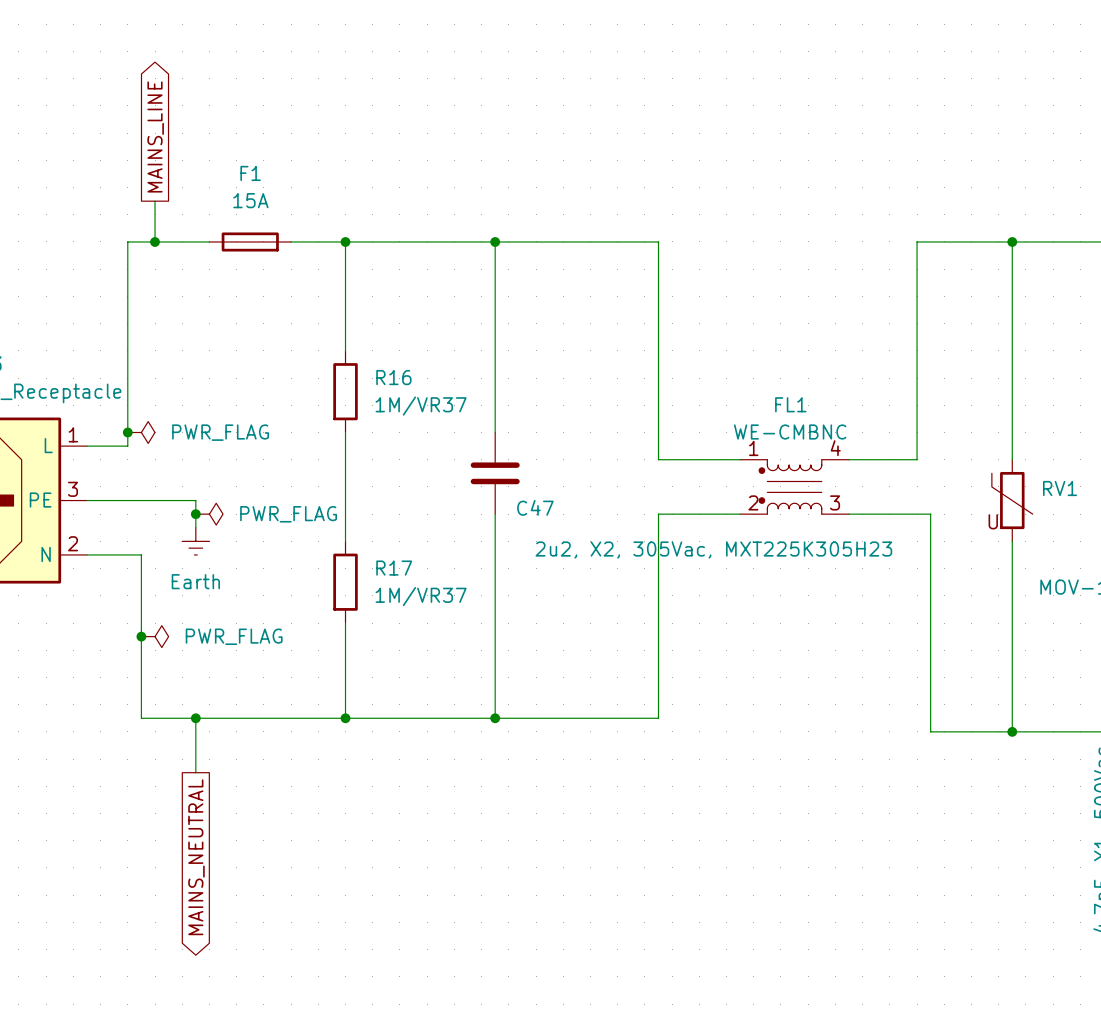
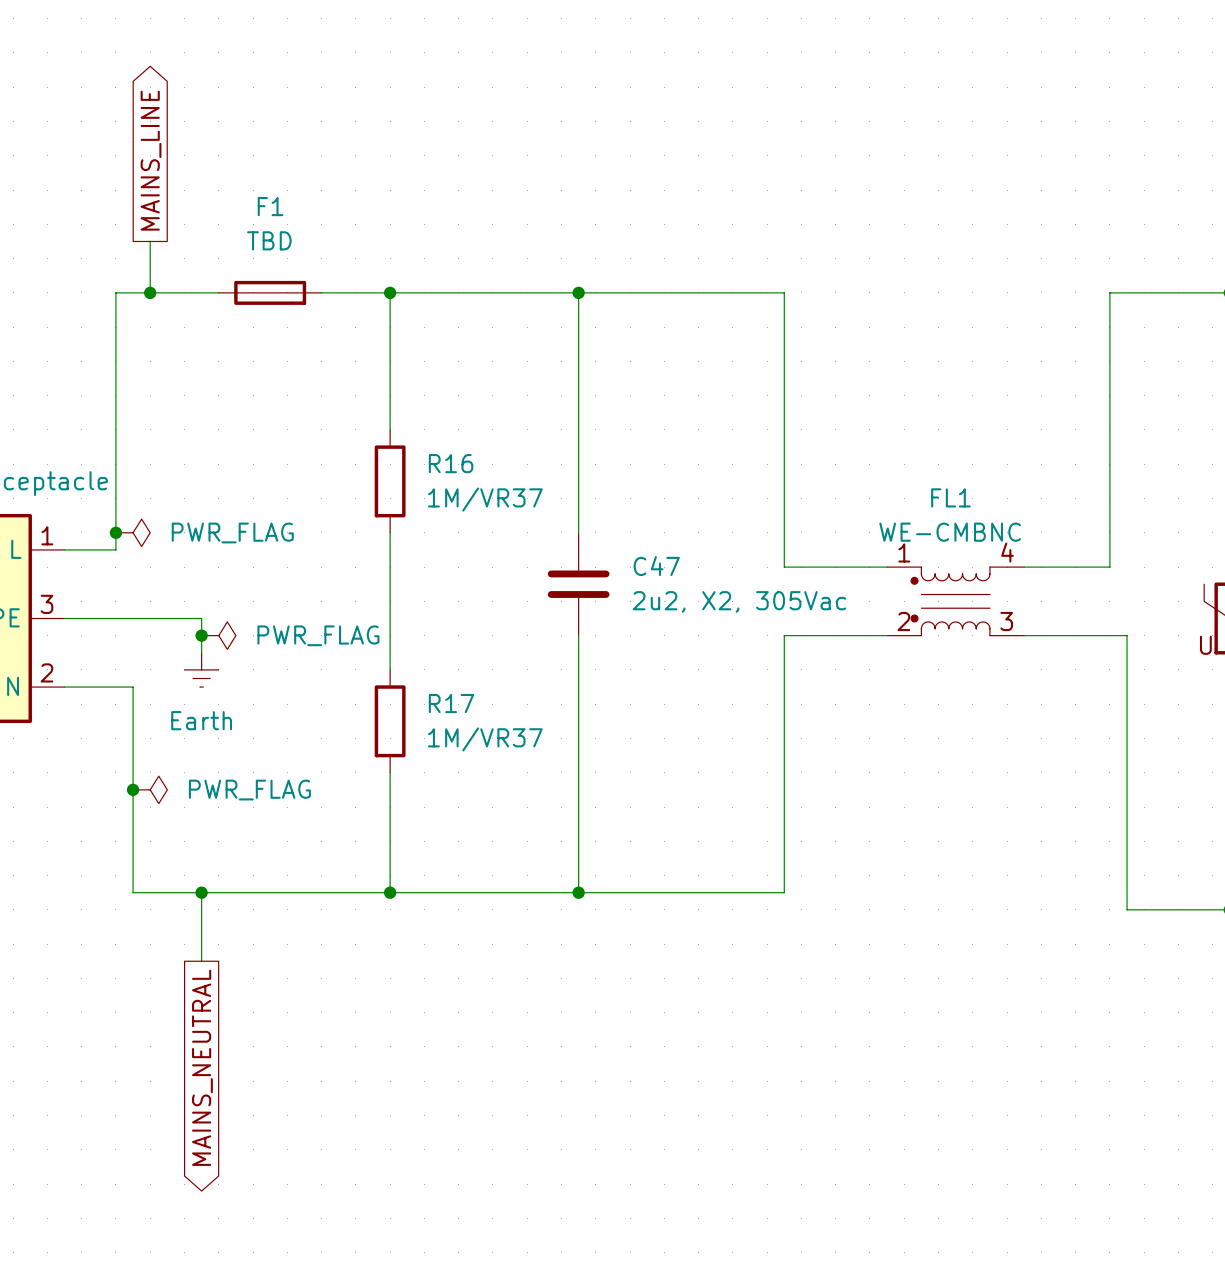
F1 value: 15A (250, 200) -> TBD (269, 240)
C47 name position: C47 (535, 507) -> C47 (656, 566)
C47 value: 2u2, X2, 305Vac, MXT225K305H23 (713, 549) -> 2u2, X2, 305Vac (739, 601)

